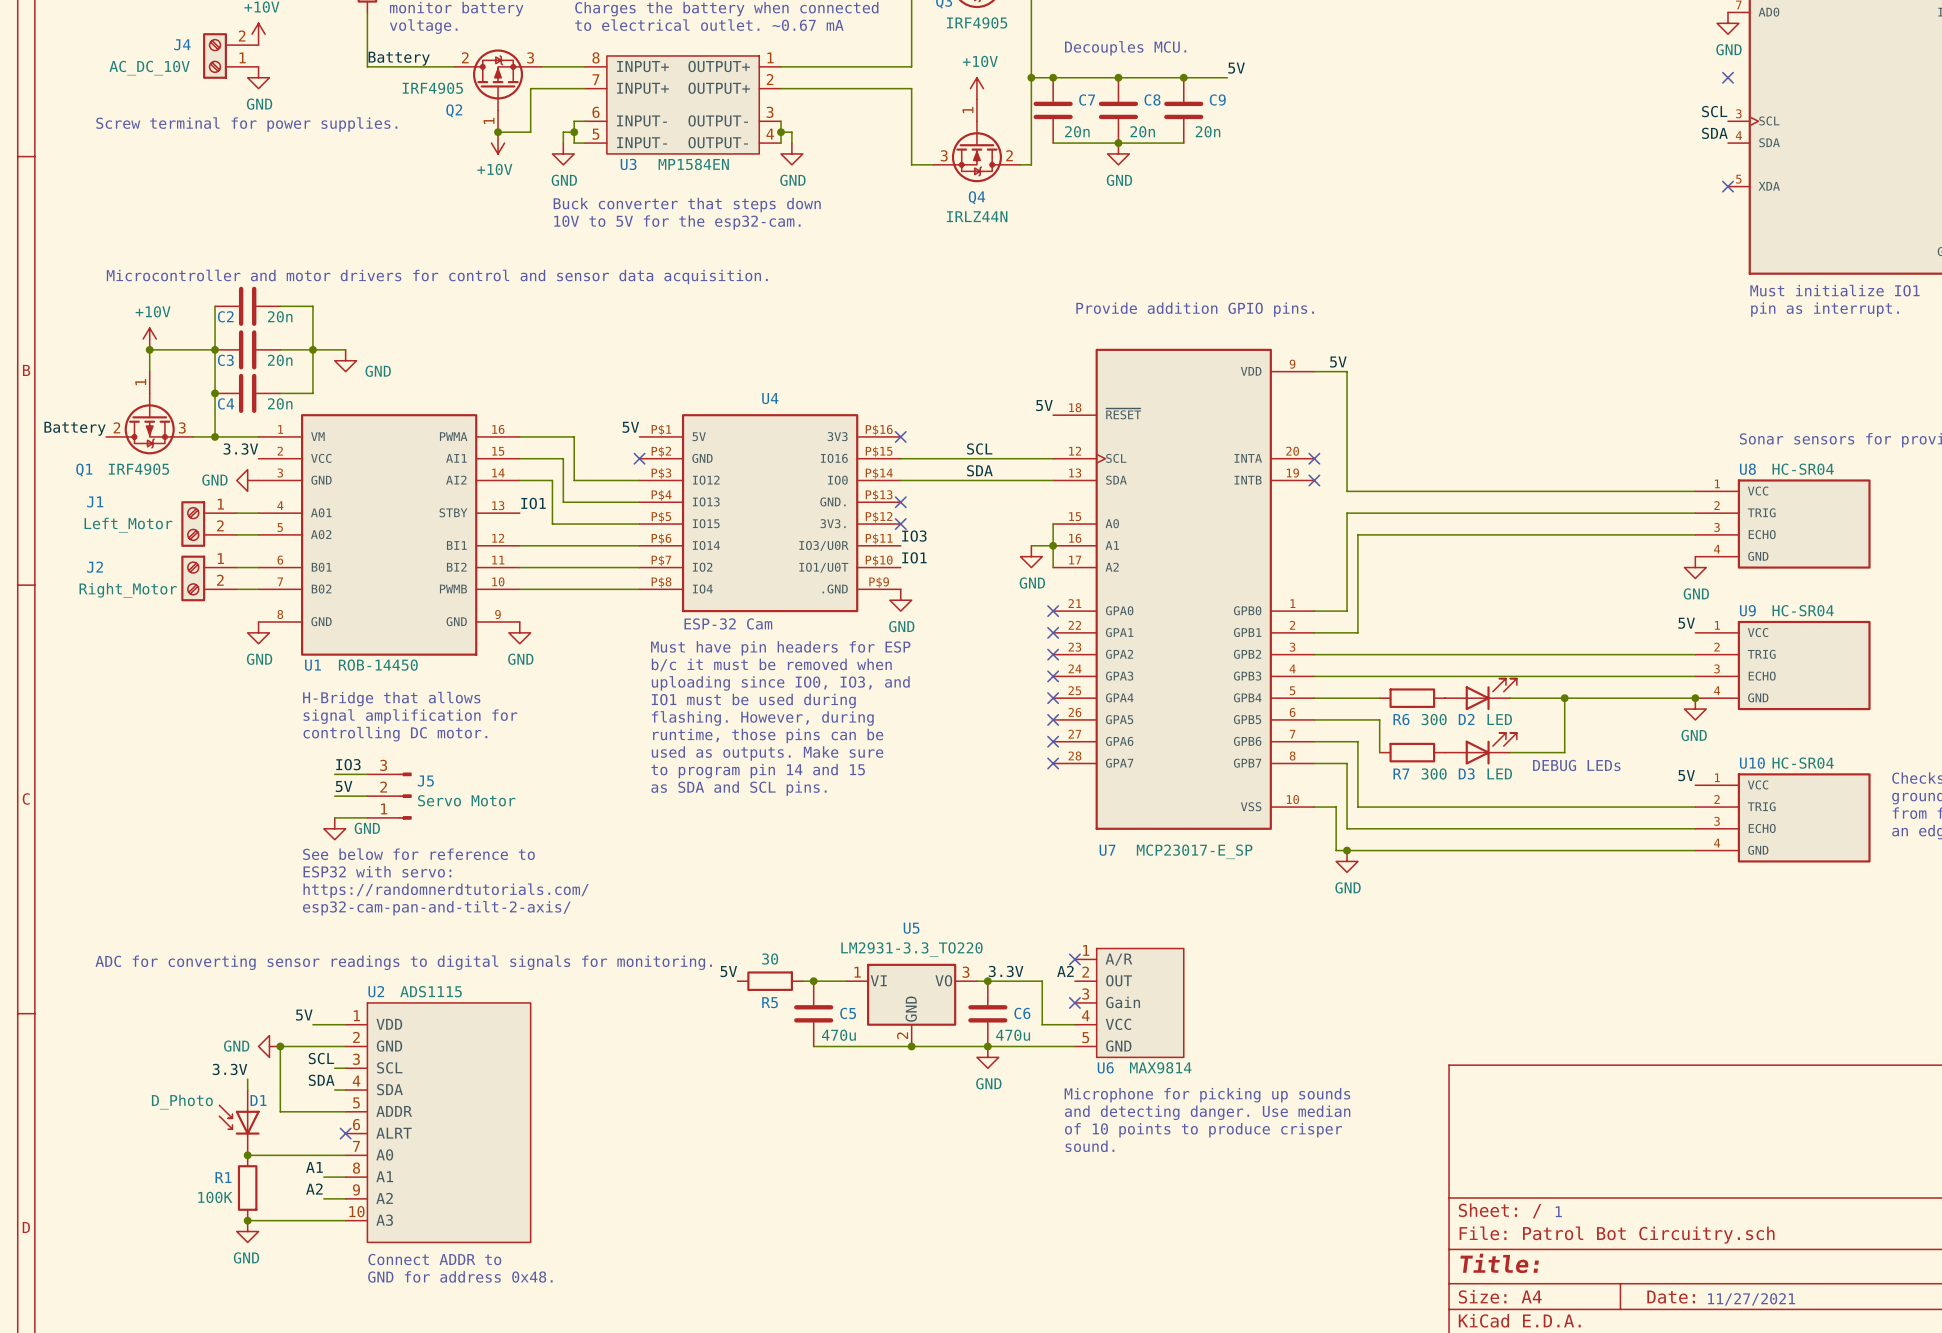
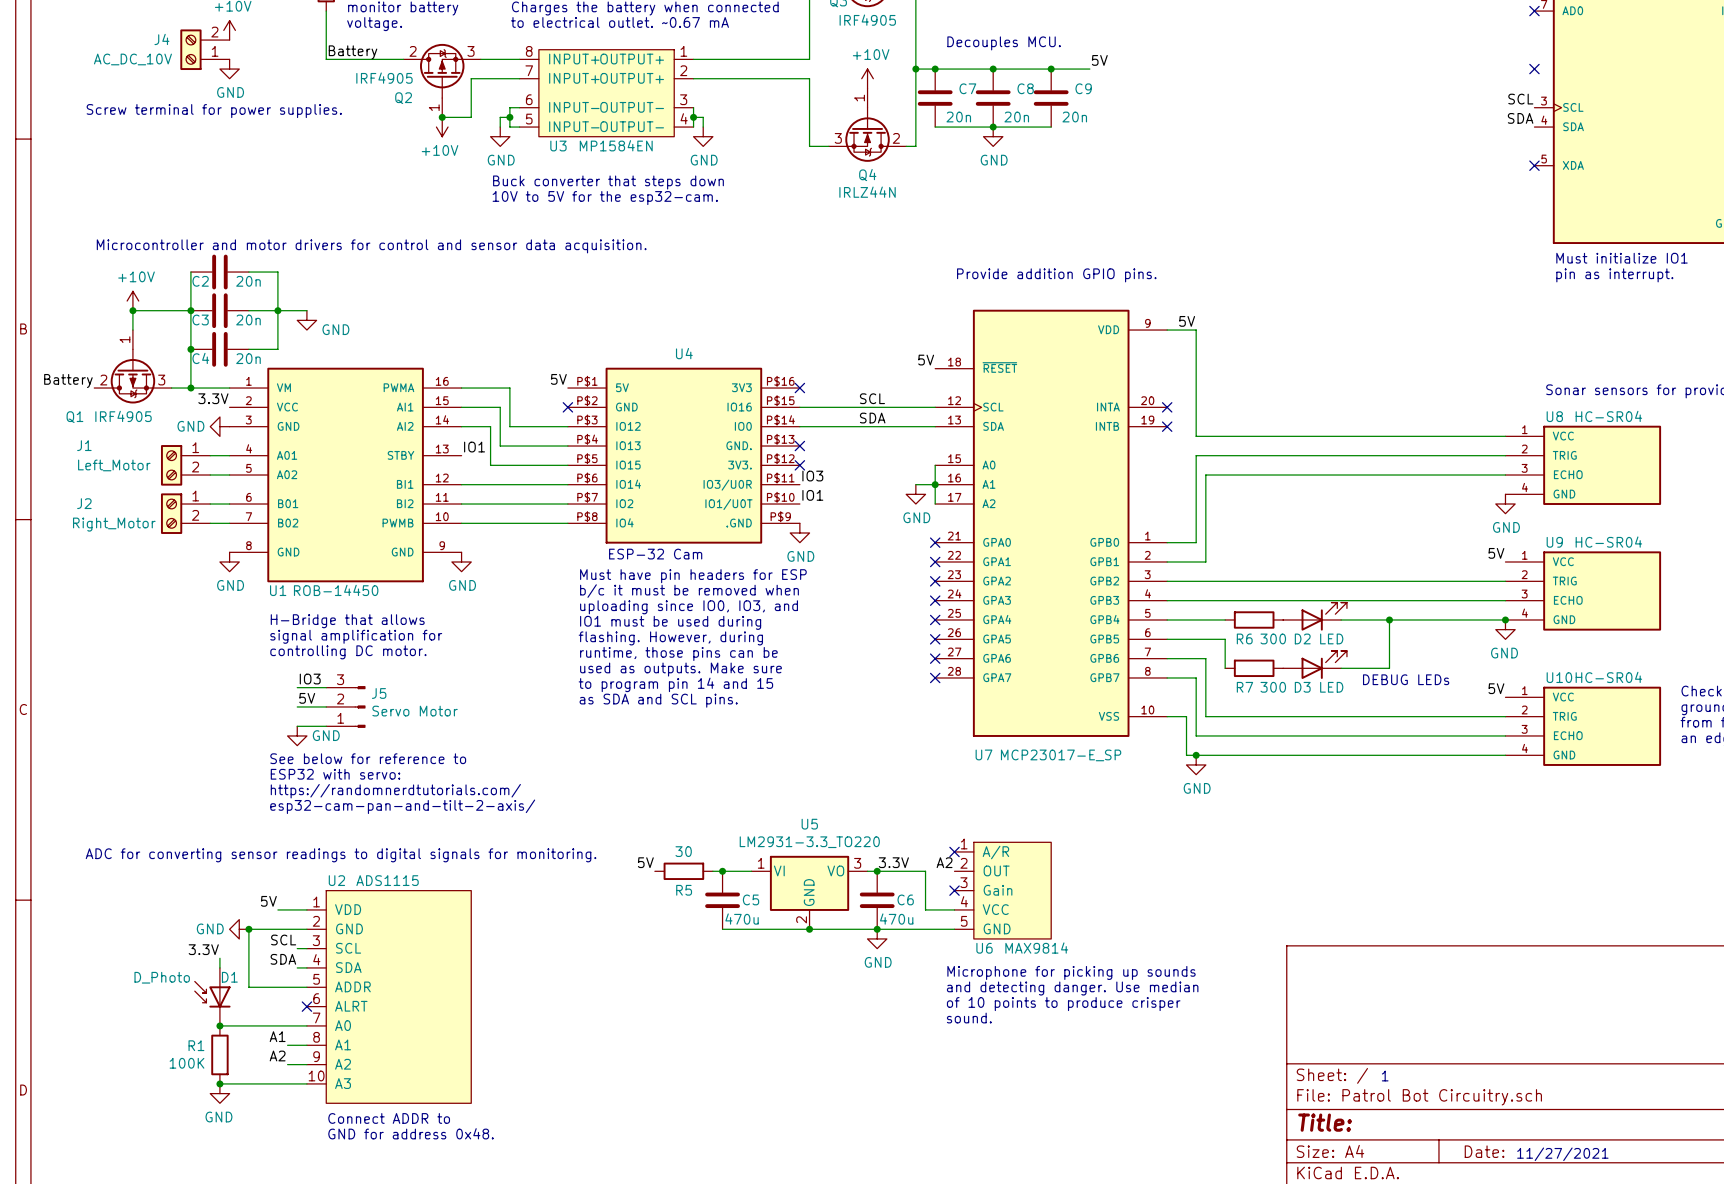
no-connect mark: none -> (1534, 11)
power symbol: GND (1727, 23) -> none

